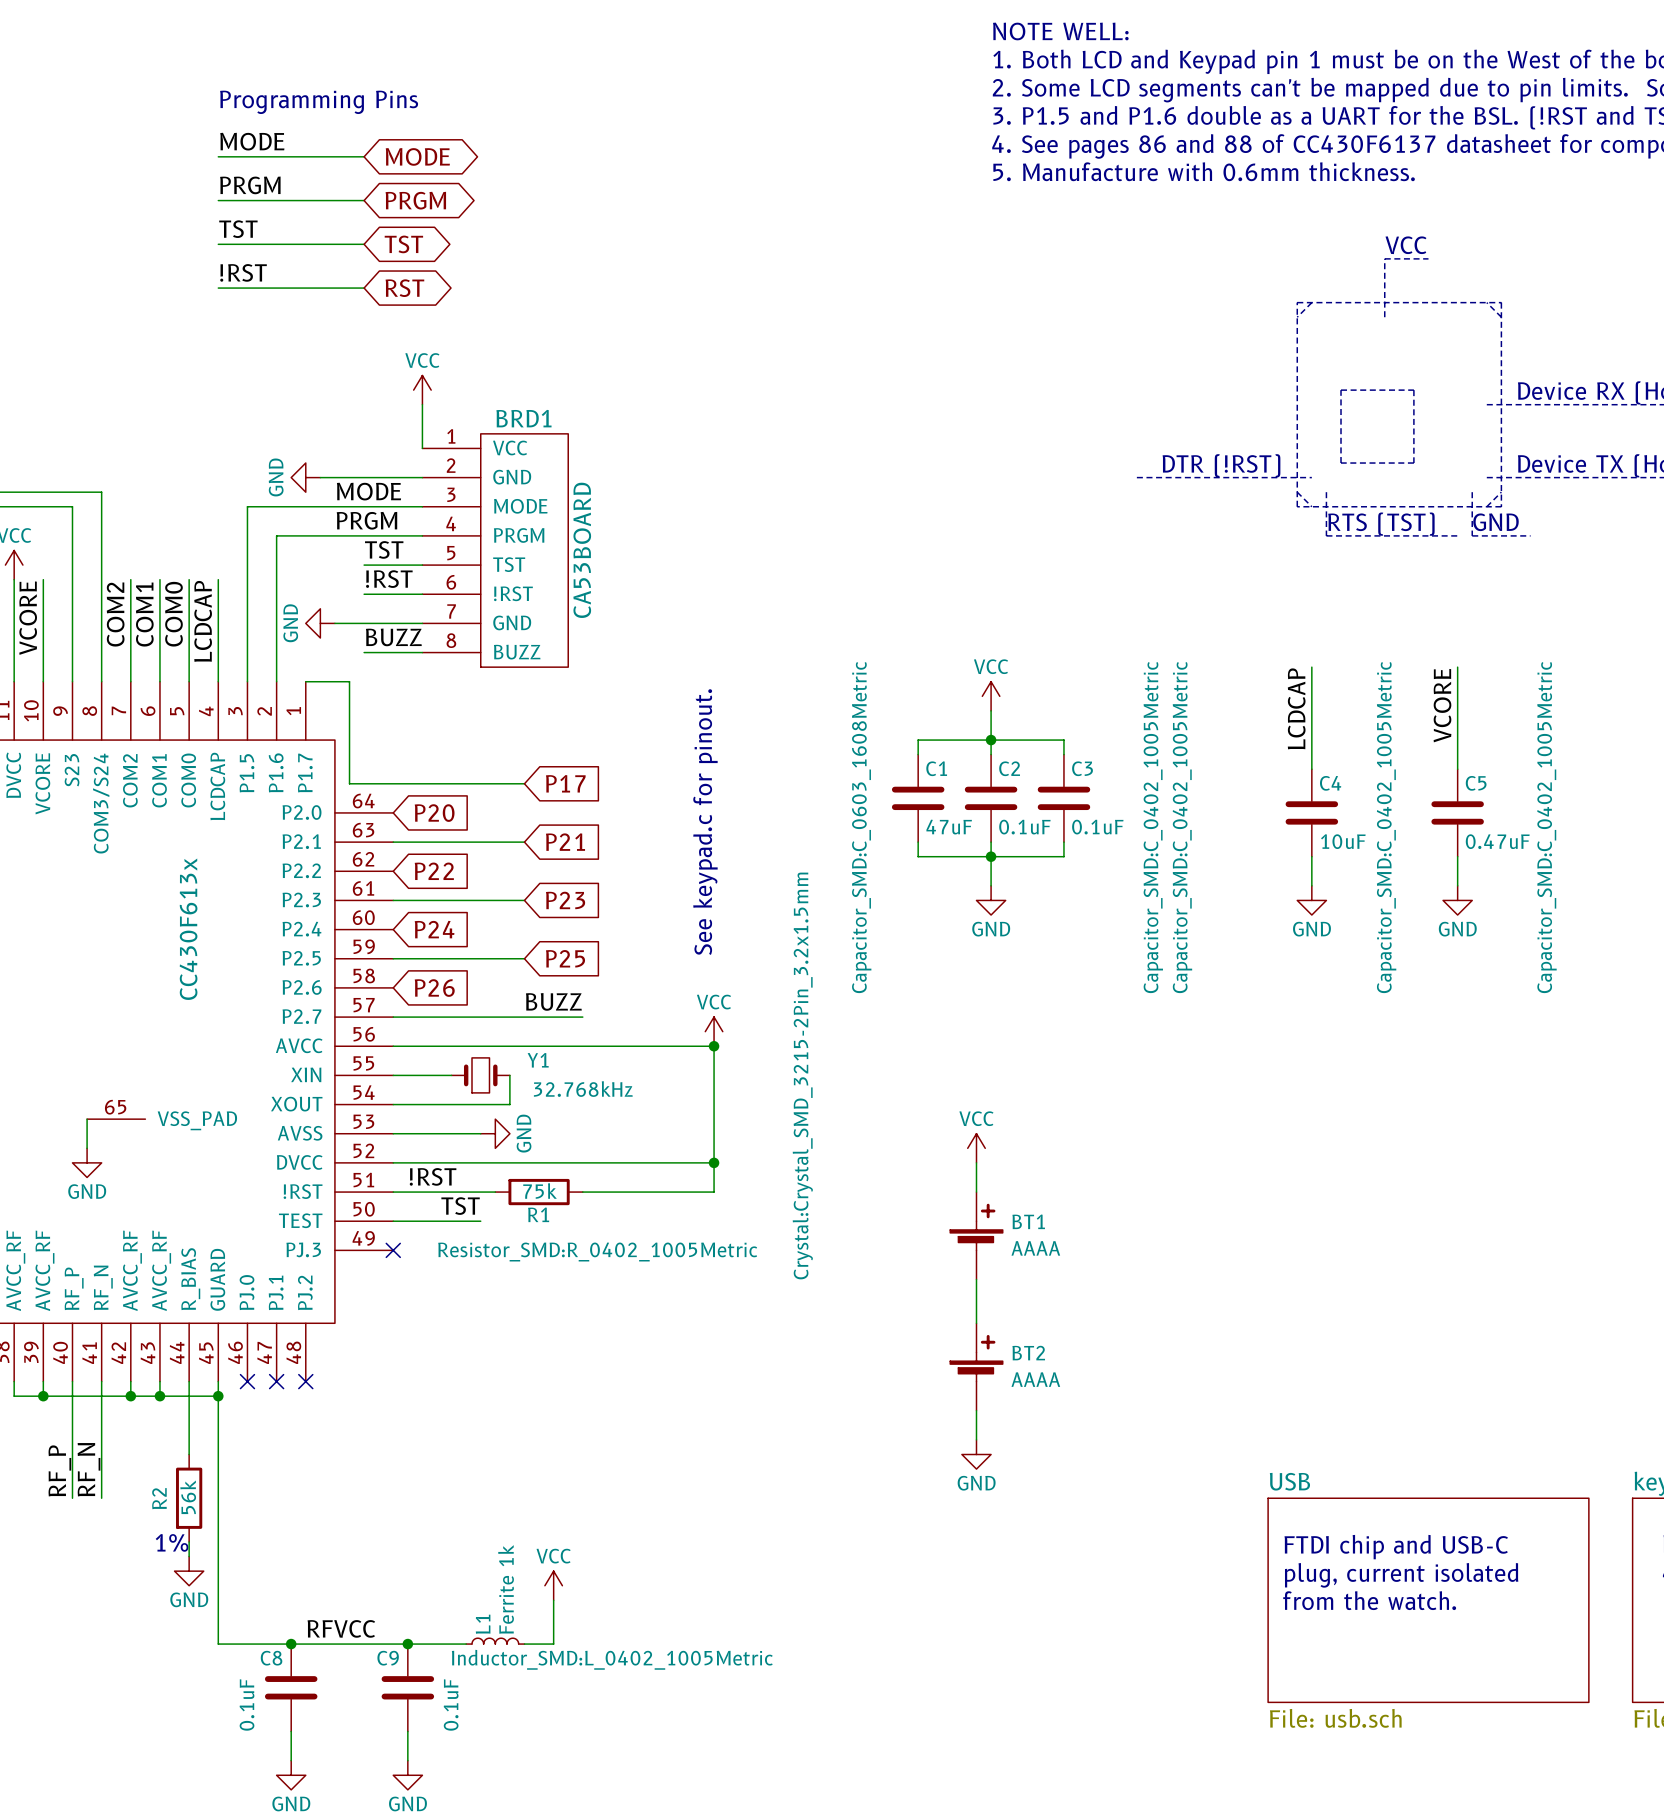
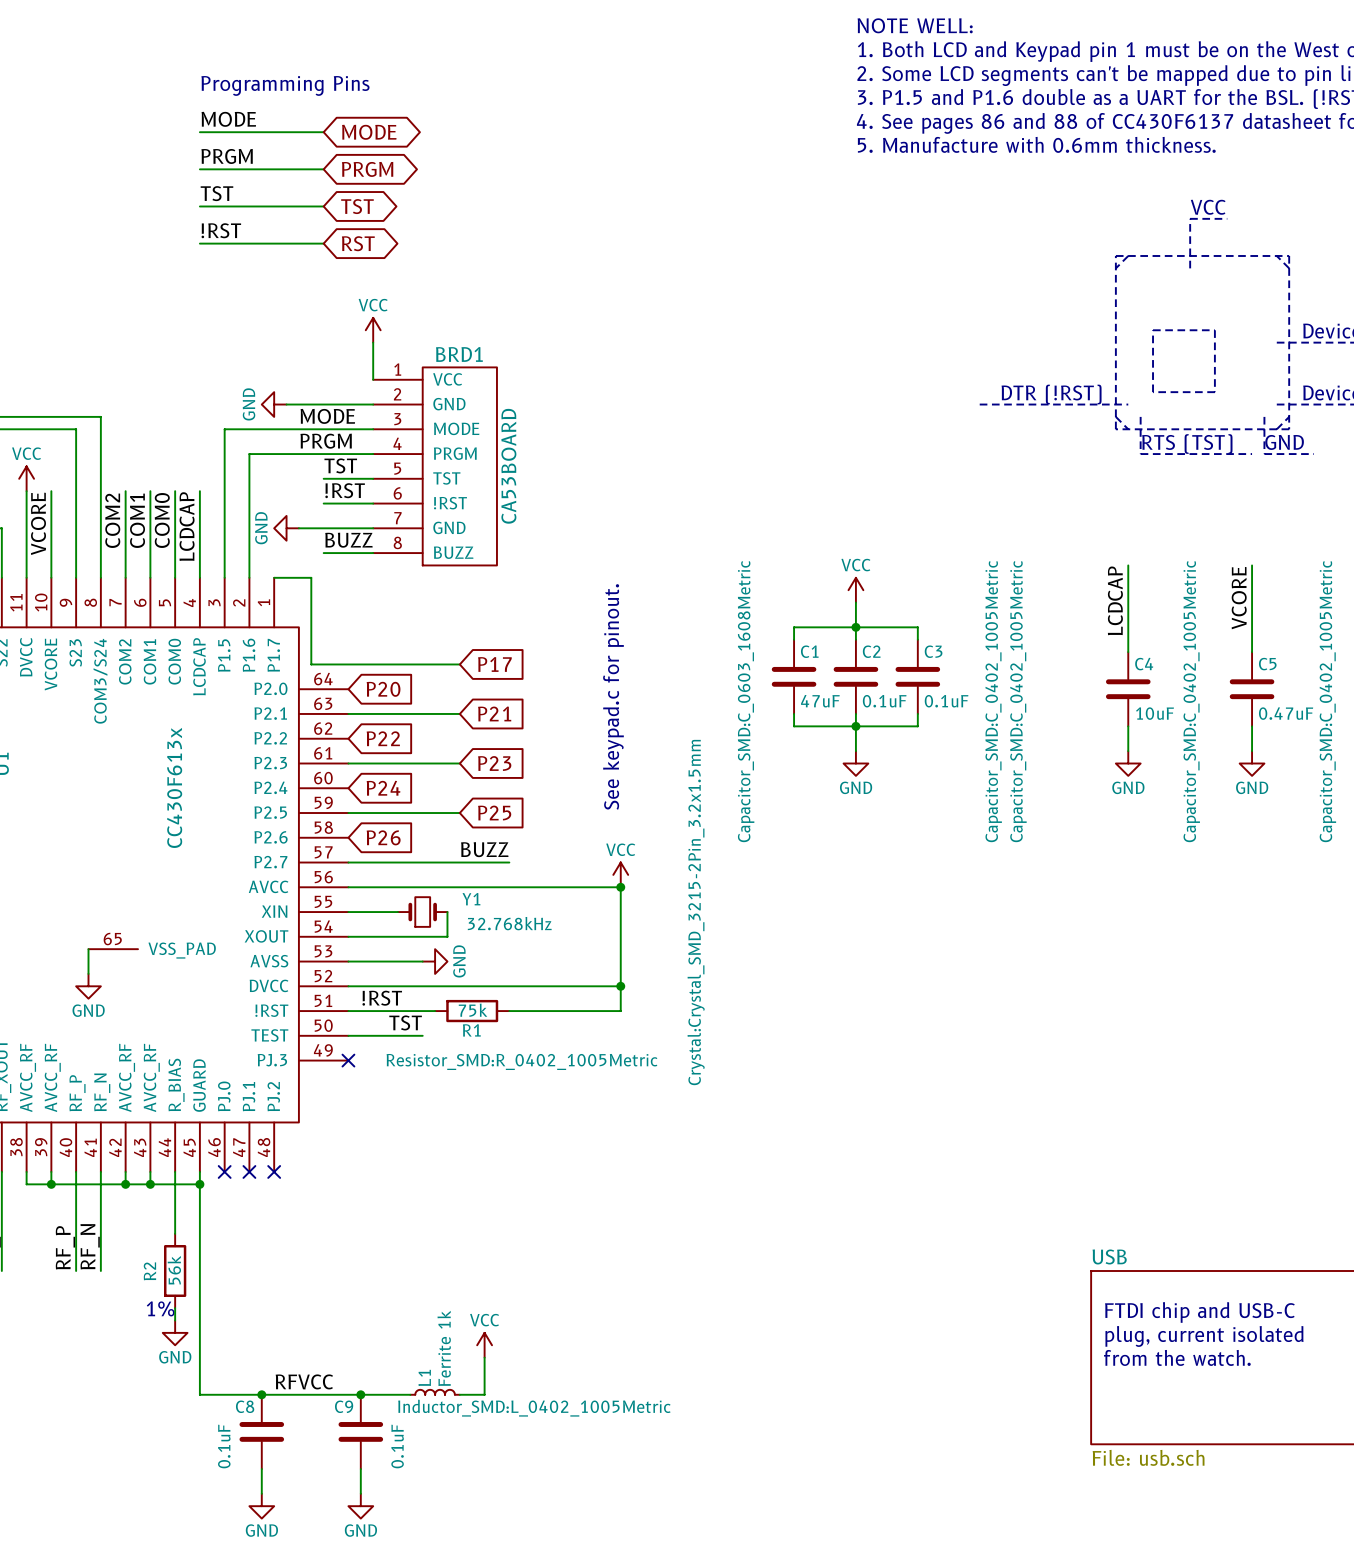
power symbol: VCC (976, 1148) -> none
wire: (976, 1162) (976, 1192) -> none
BT1: AAAA (976, 1235) -> none
wire: (976, 1279) (976, 1323) -> none
BT2: AAAA (976, 1367) -> none
wire: (976, 1410) (976, 1439) -> none
power symbol: GND (976, 1454) -> none

